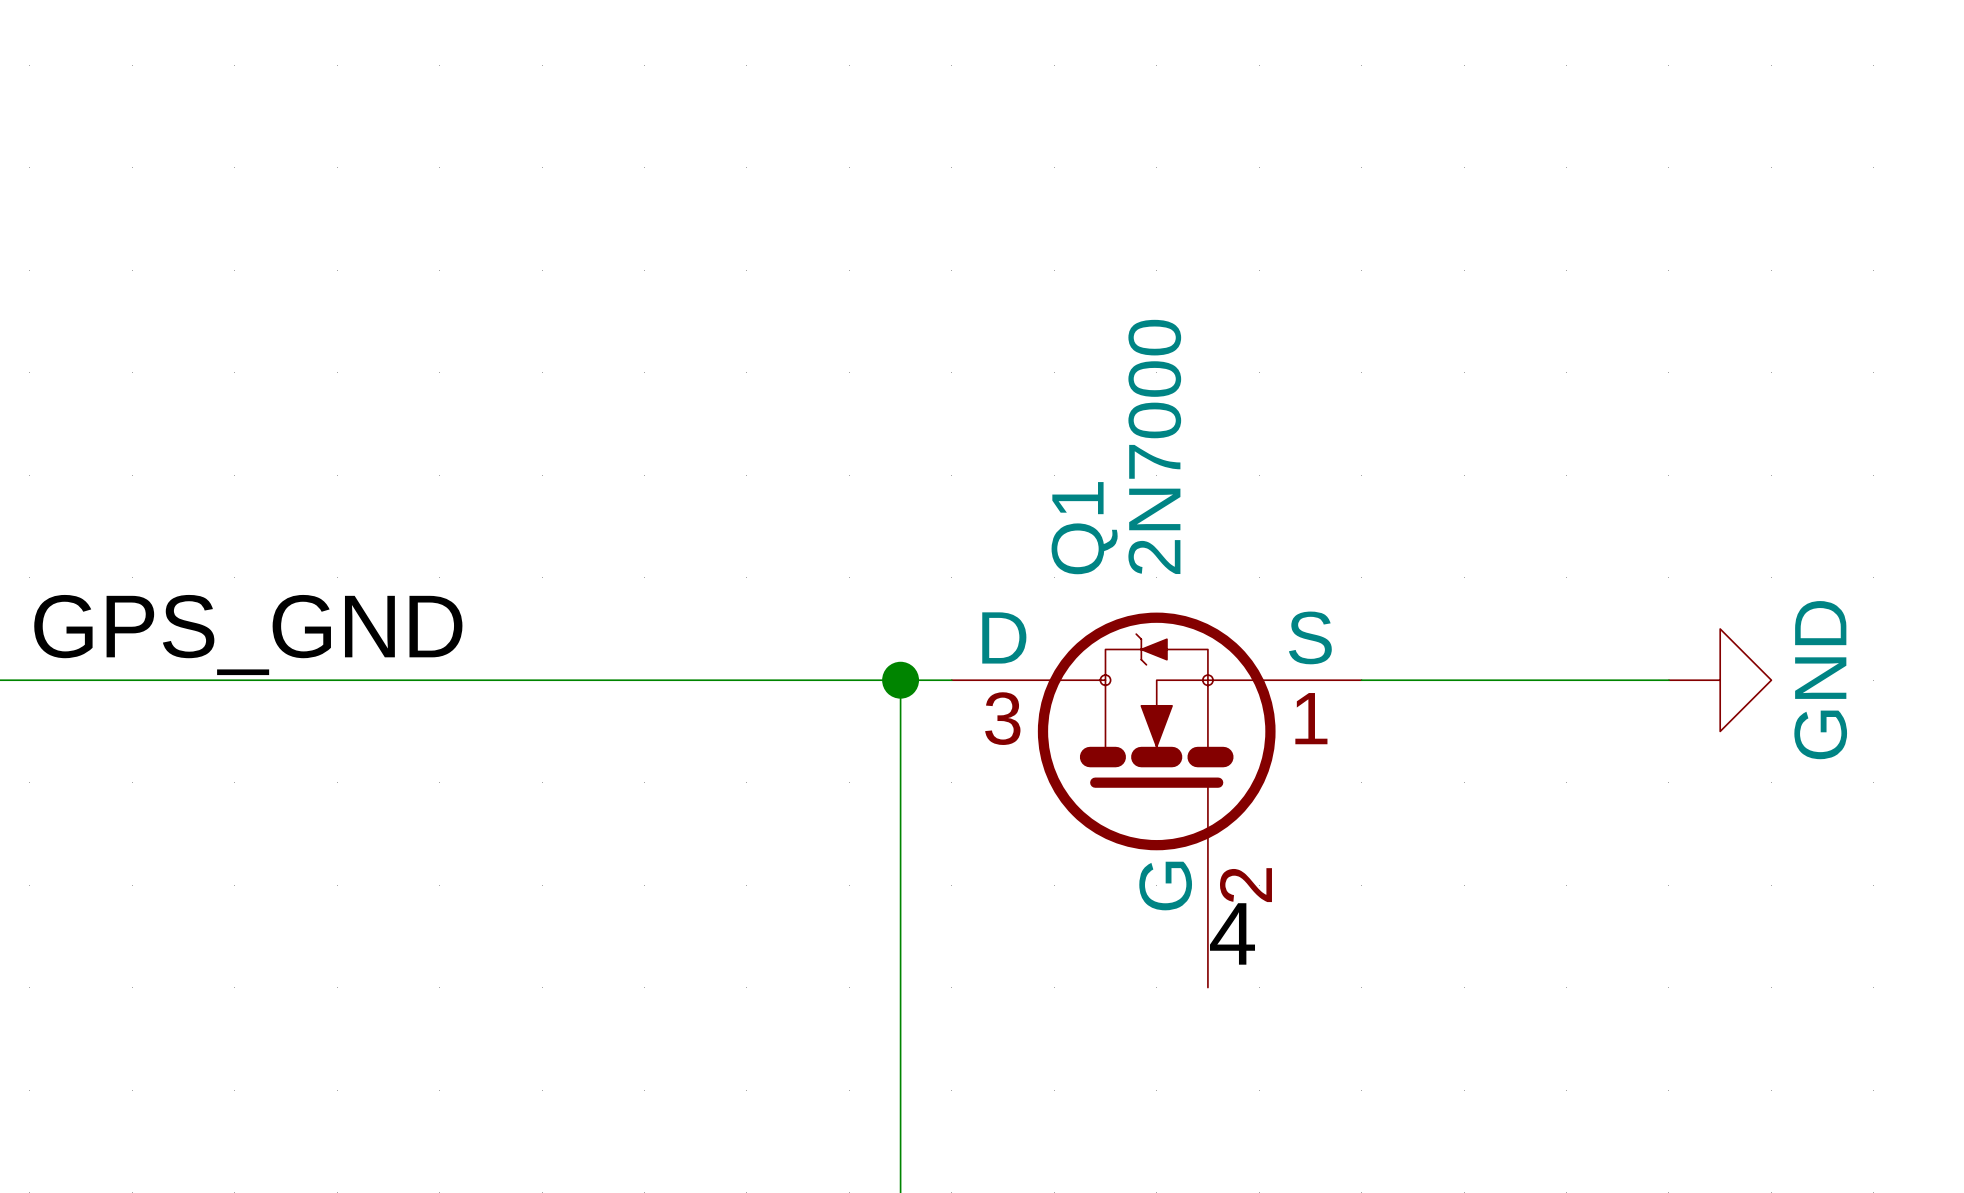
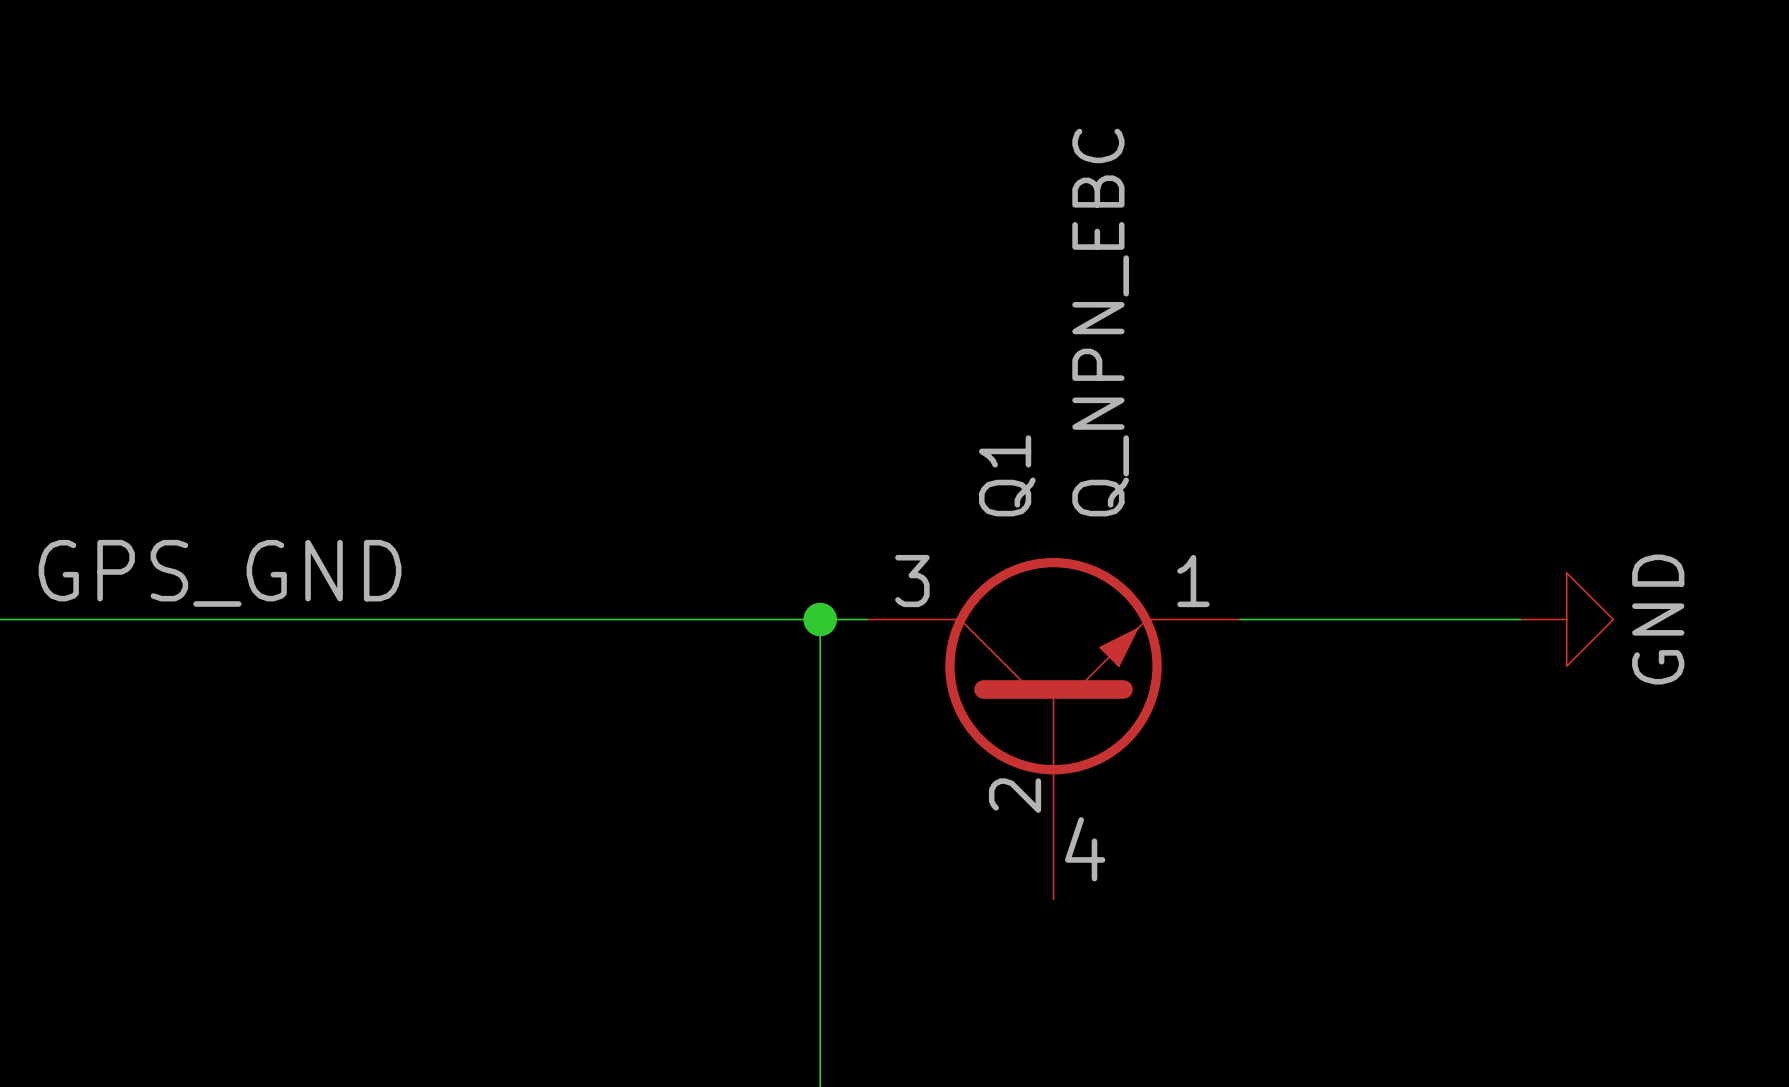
Q1 value: 2N7000 (1154, 446) -> Q_NPN_EBC (1100, 322)
Q1 symbol: [951, 612, 1362, 988] -> [866, 557, 1241, 900]
label position: 4 (1232, 933) -> 4 (1085, 849)

